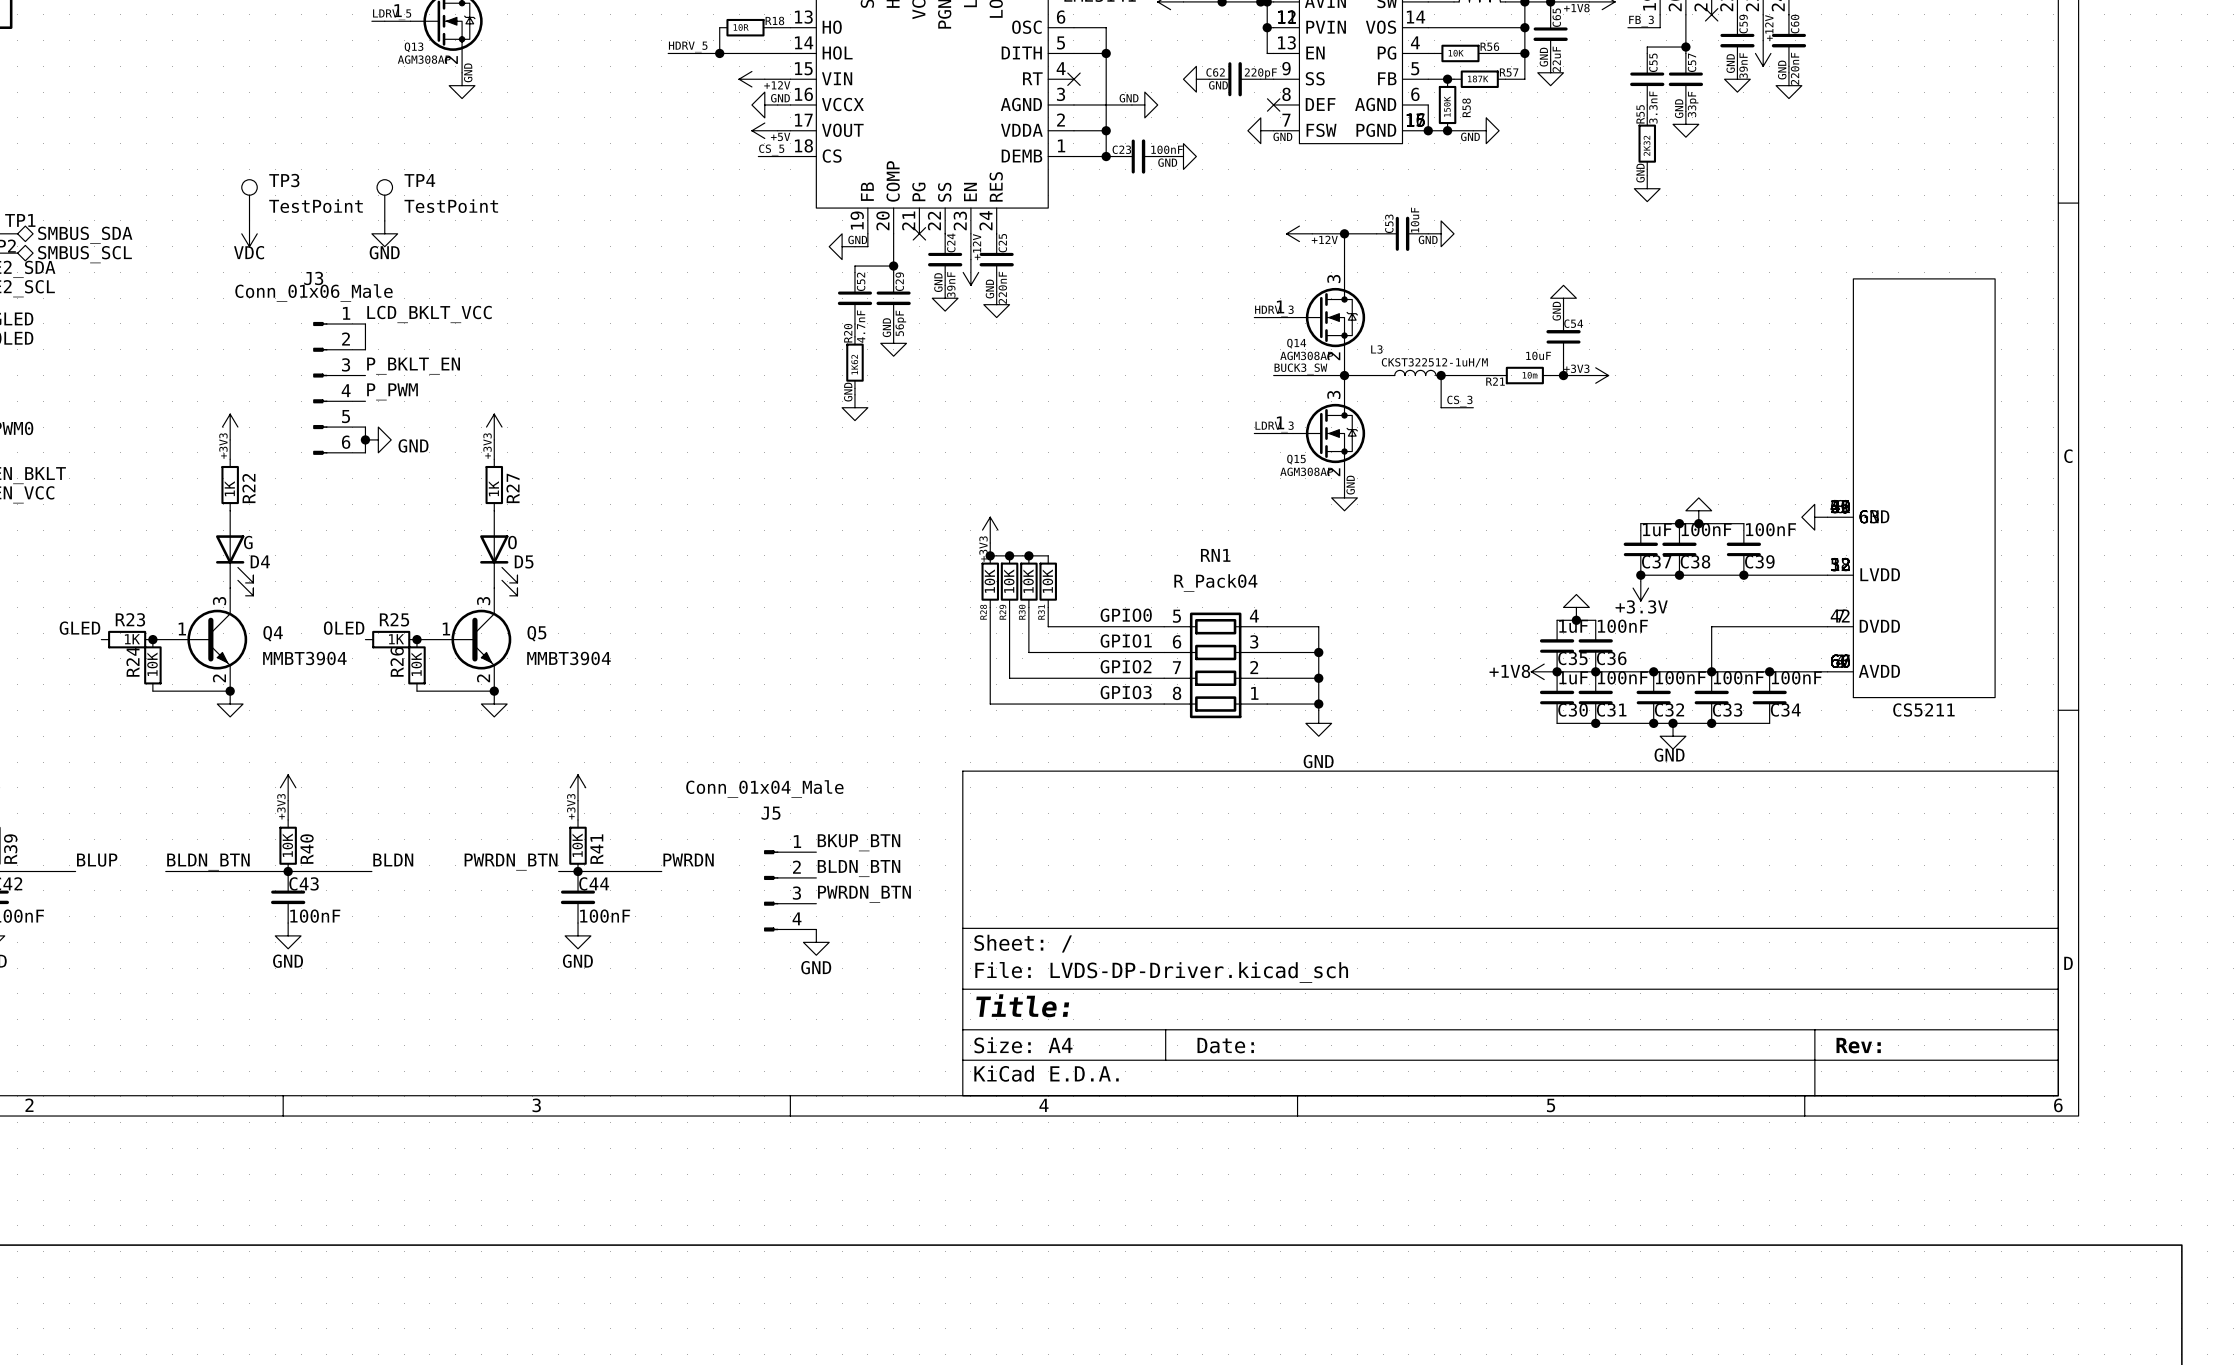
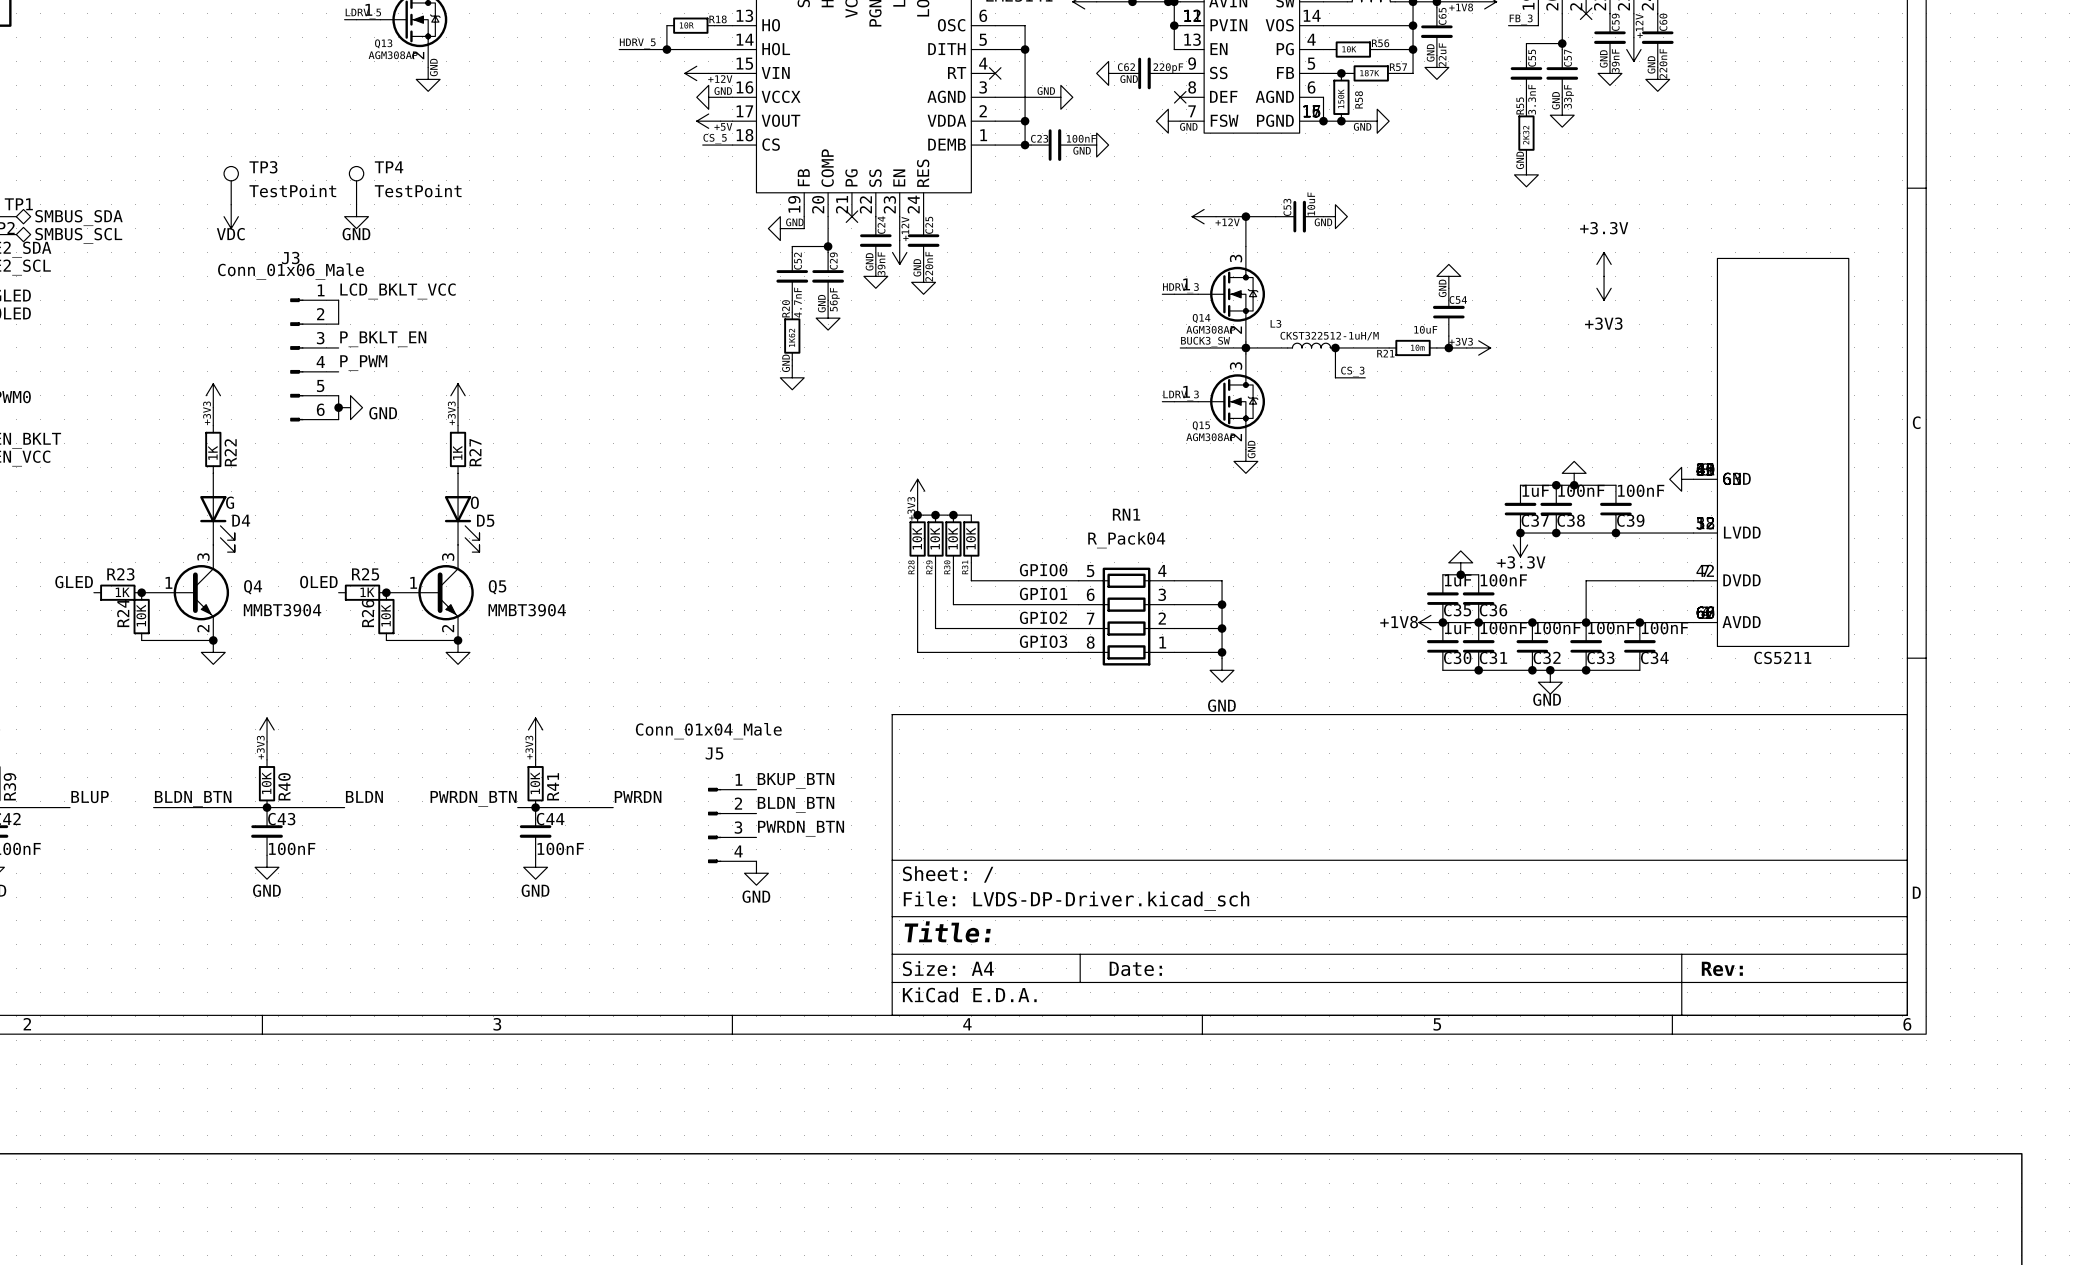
power symbol: none -> +3.3V (1604, 264)
power symbol: none -> +3V3 (1604, 288)

